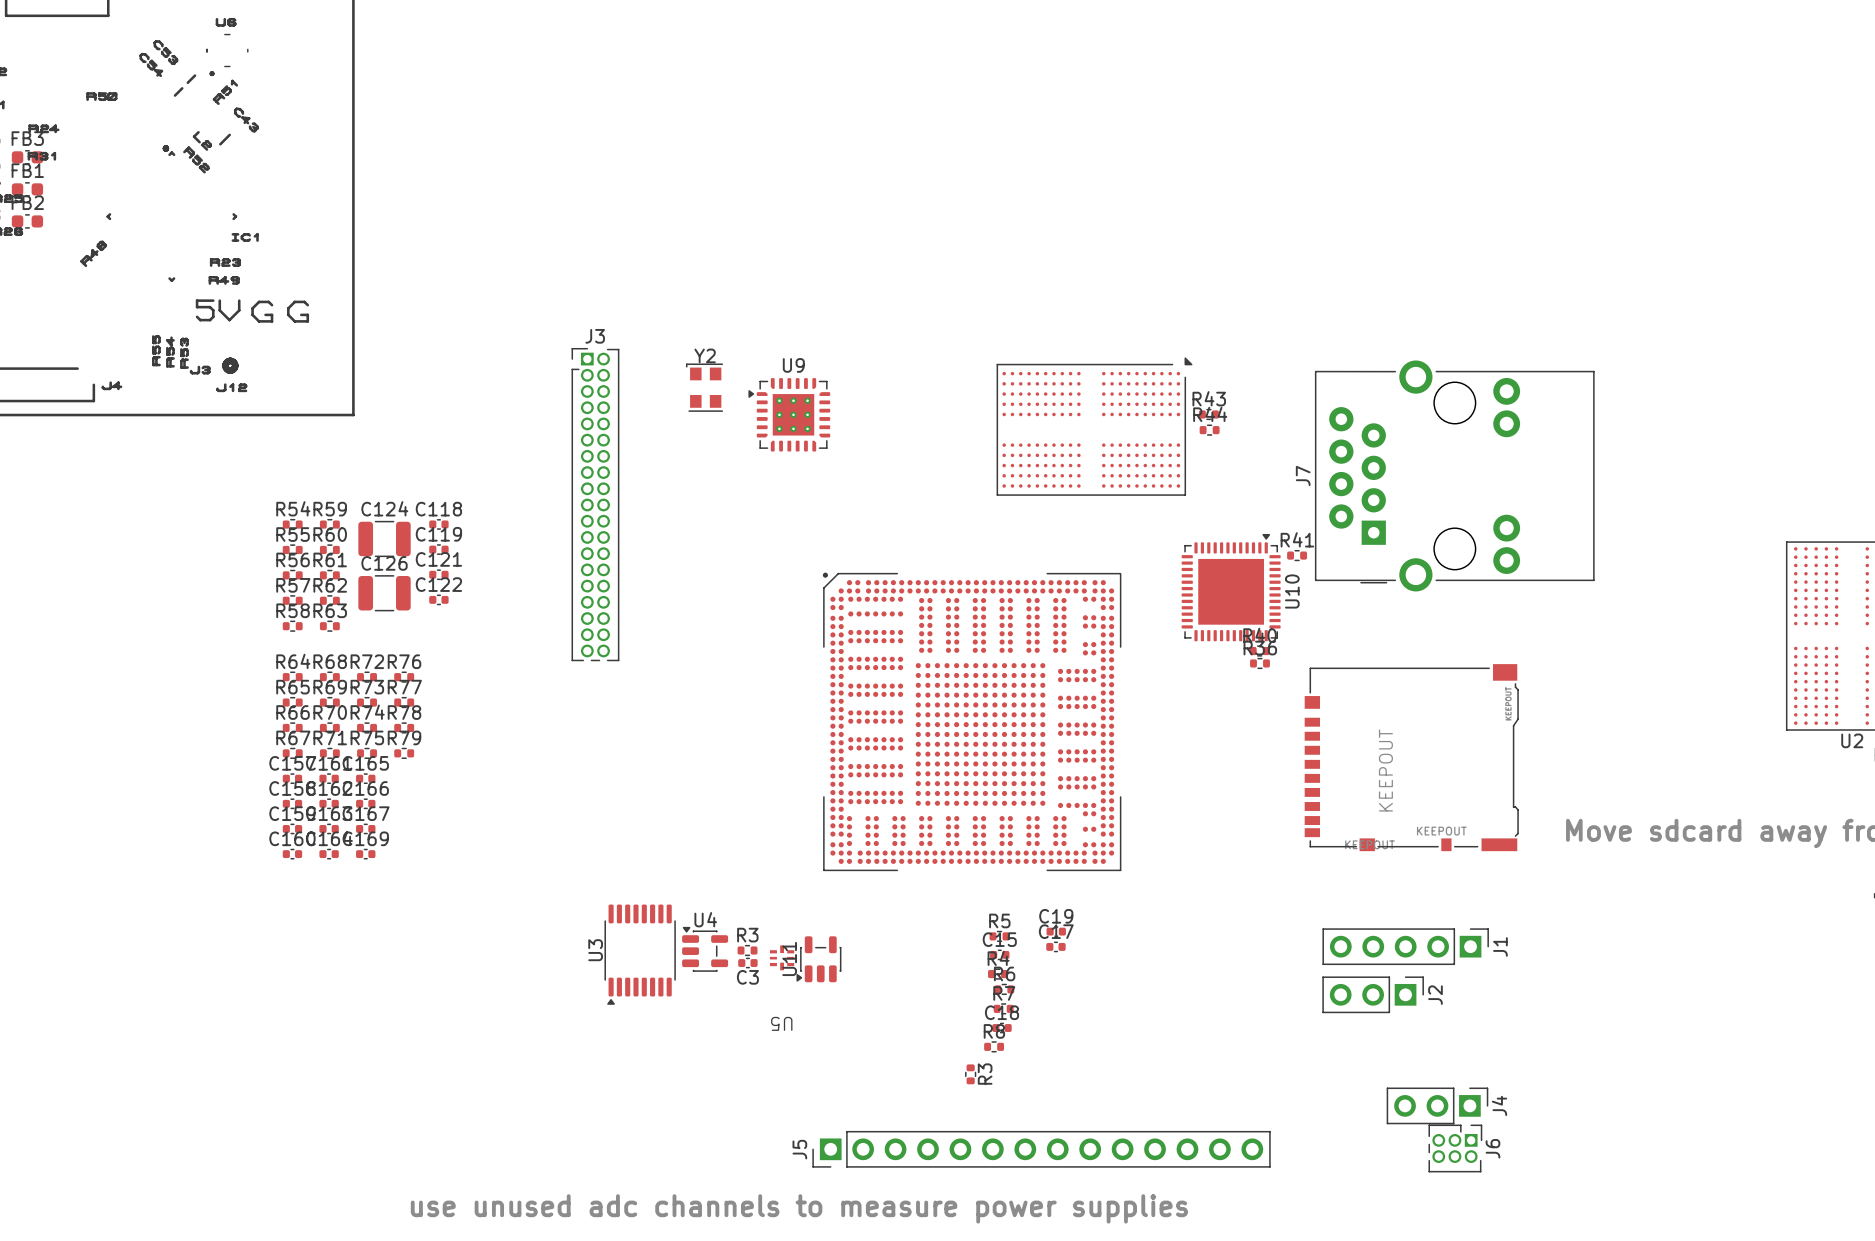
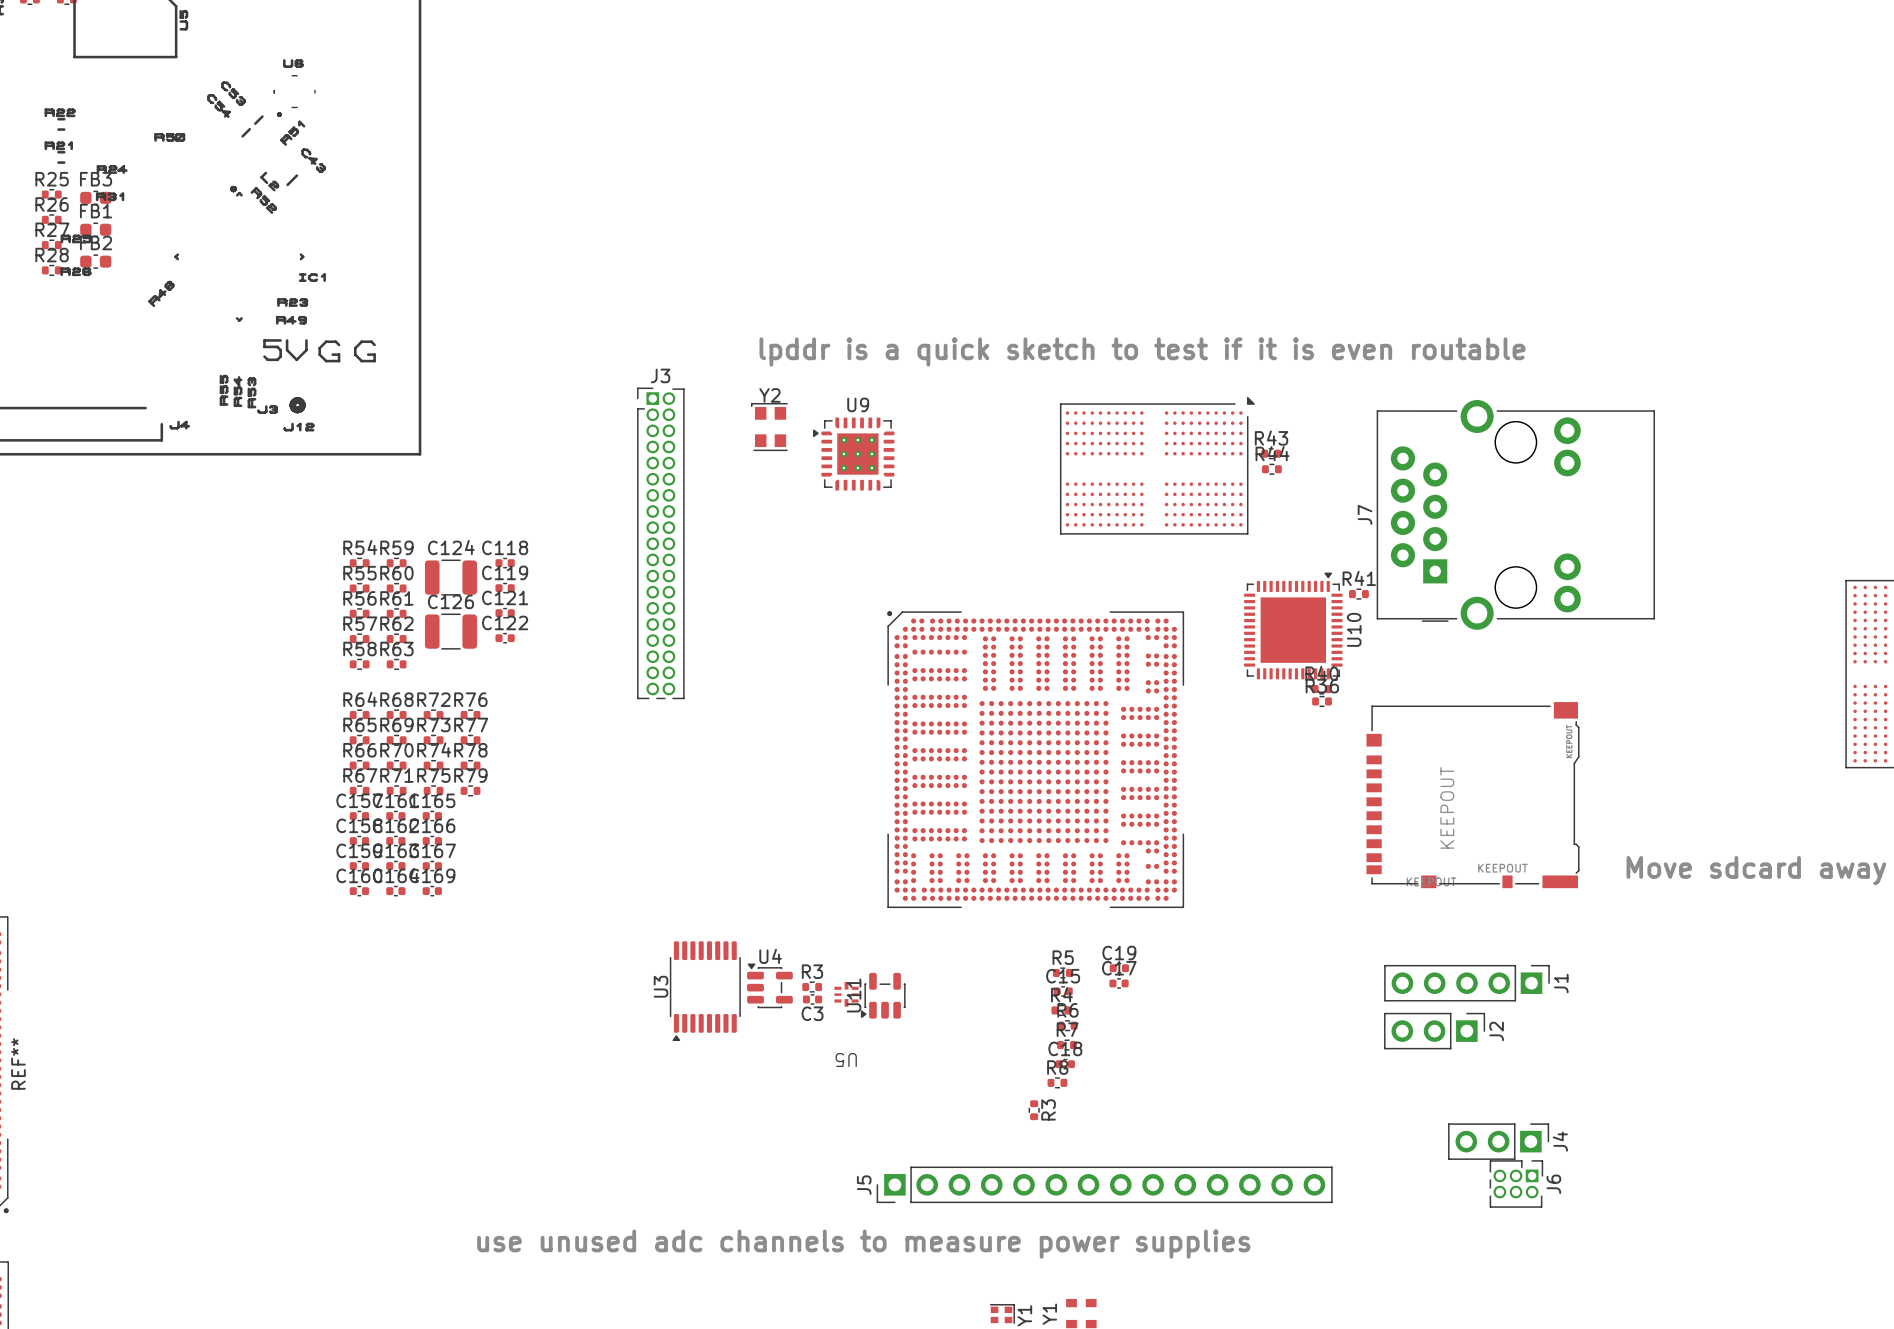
text: none -> lpddr is a quick sketch to test if it is even routable (1142, 351)

